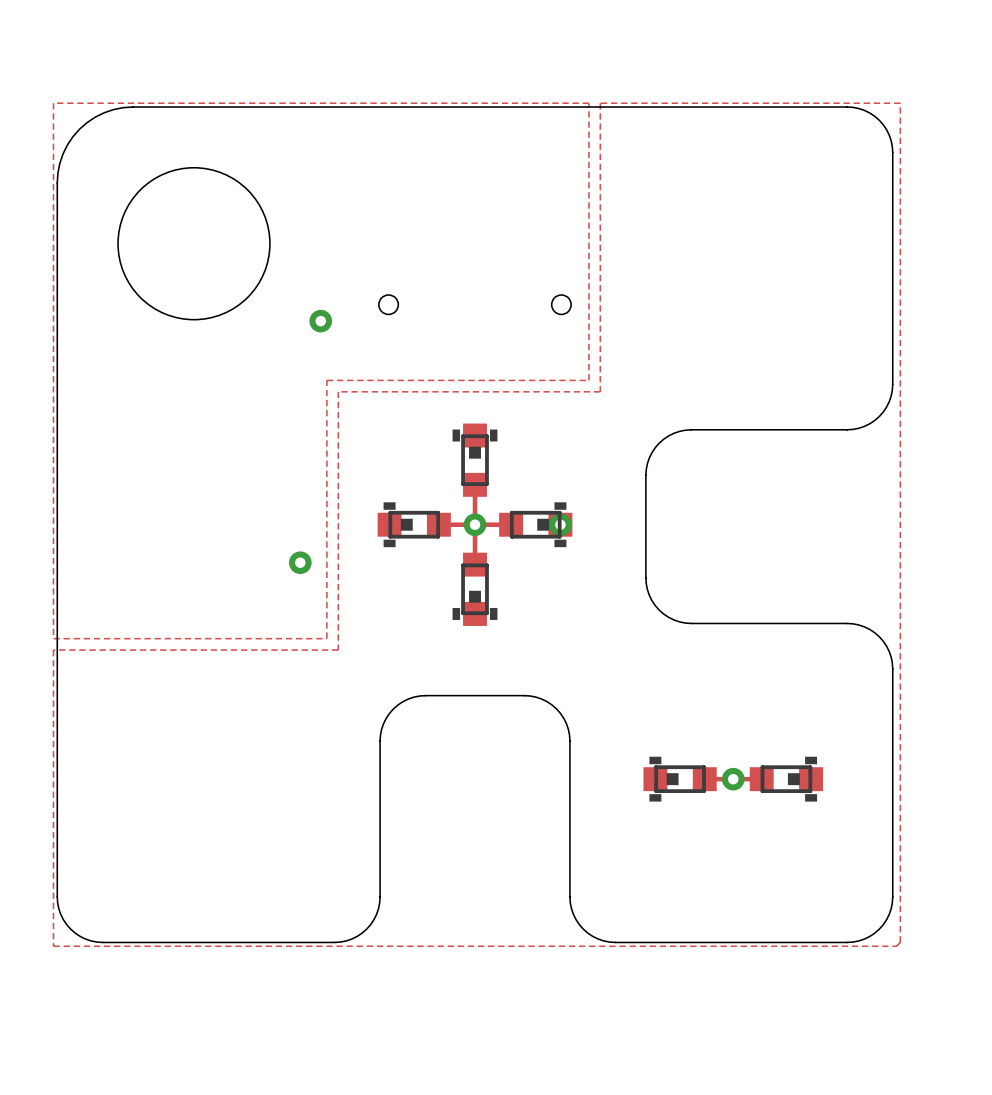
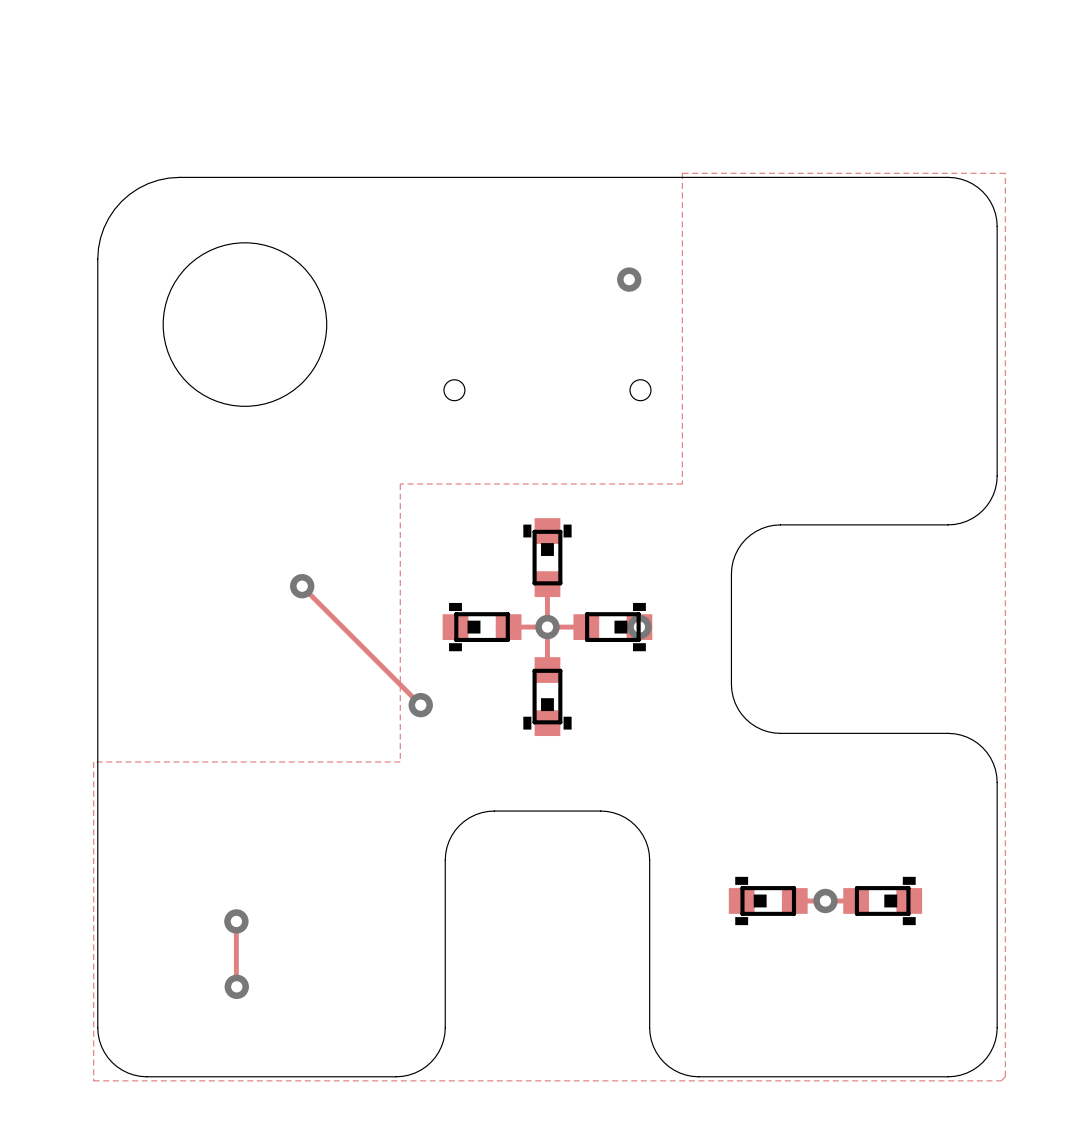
zone outline: (53, 103) (588, 103) (588, 380) (326, 380) (326, 638) (53, 638) (53, 103) -> none
via: none -> (629, 279)
via: (320, 321) -> none
via: none -> (302, 586)
track: none -> (302, 586) (420, 705)
via: (300, 562) -> none
via: none -> (420, 705)
track: none -> (236, 921) (236, 986)
via: none -> (236, 921)
via: none -> (236, 986)

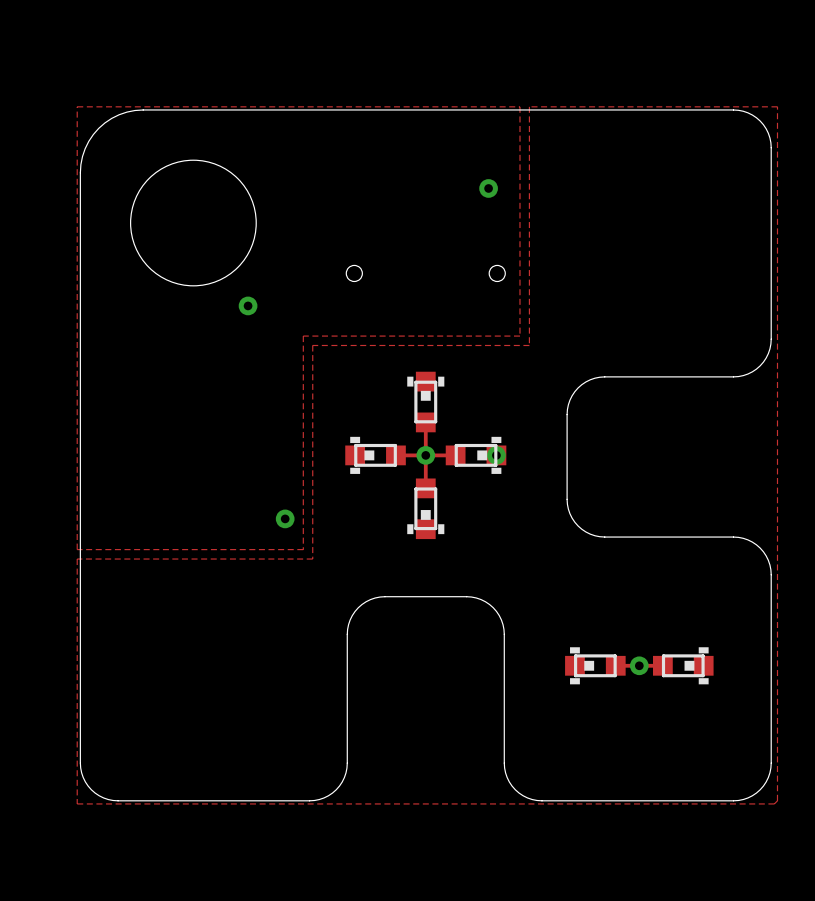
zone outline: none -> (77, 106) (77, 549) (303, 549) (303, 336) (519, 336) (519, 106) (77, 106)
via: none -> (248, 305)
track: (302, 586) (420, 705) -> none
via: (302, 586) -> none
via position: (420, 705) -> (285, 518)
track: (236, 921) (236, 986) -> none
via: (236, 921) -> none
via: (236, 986) -> none

